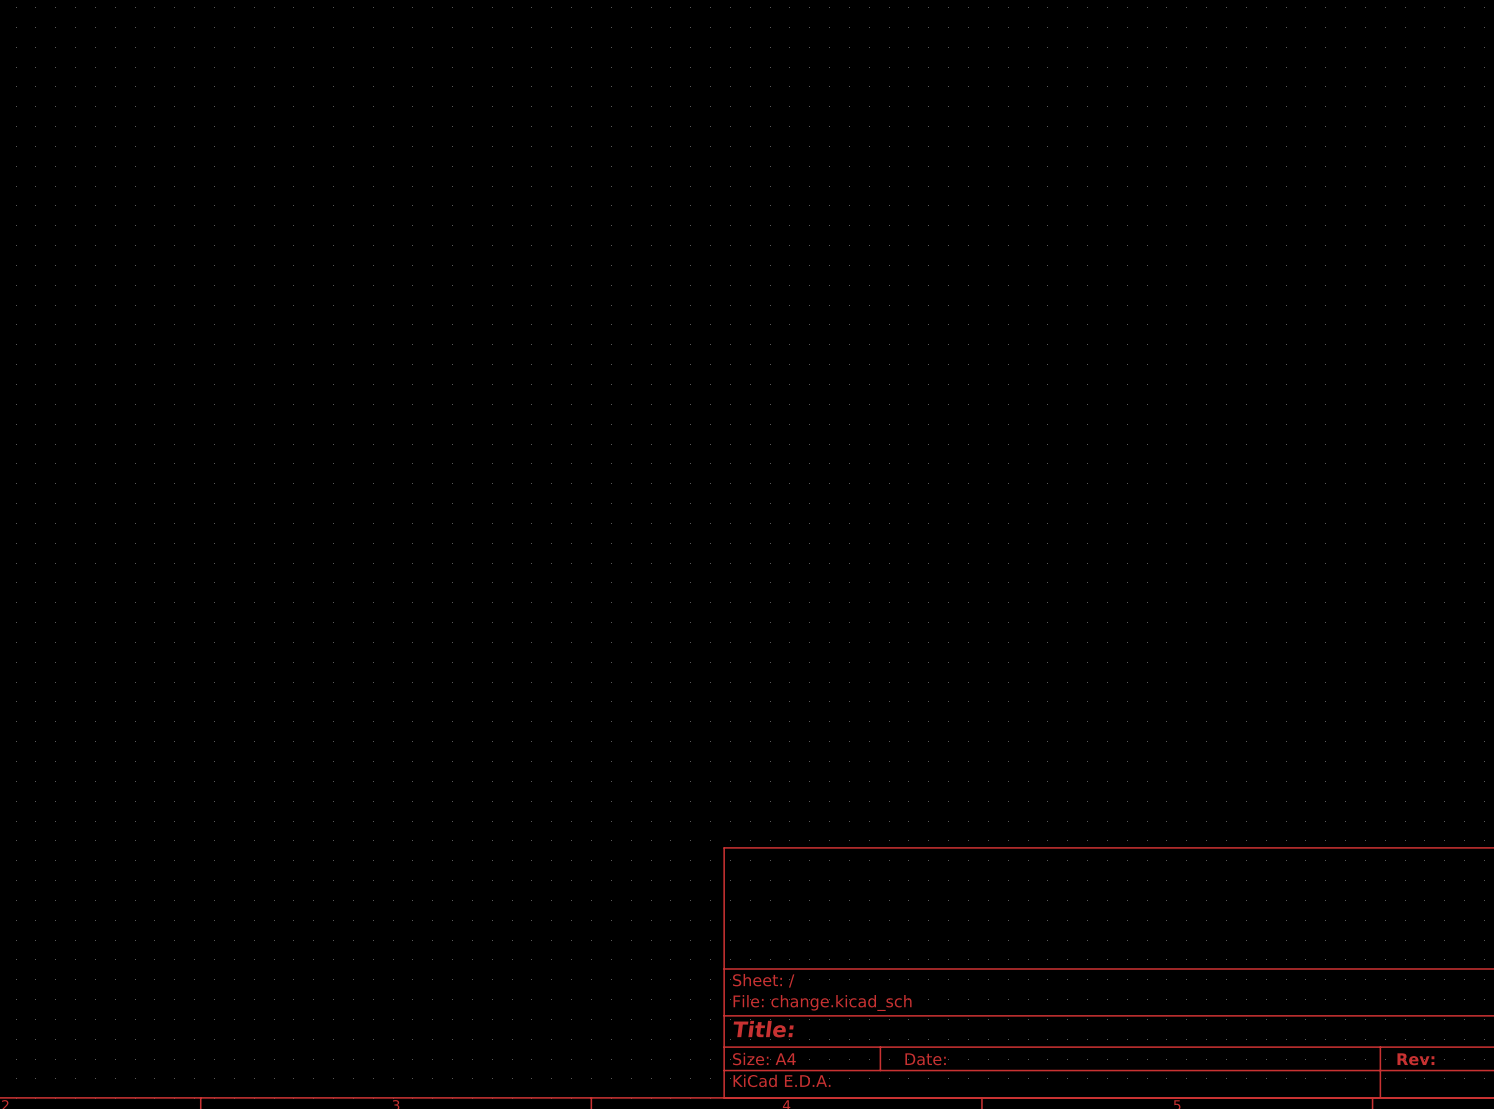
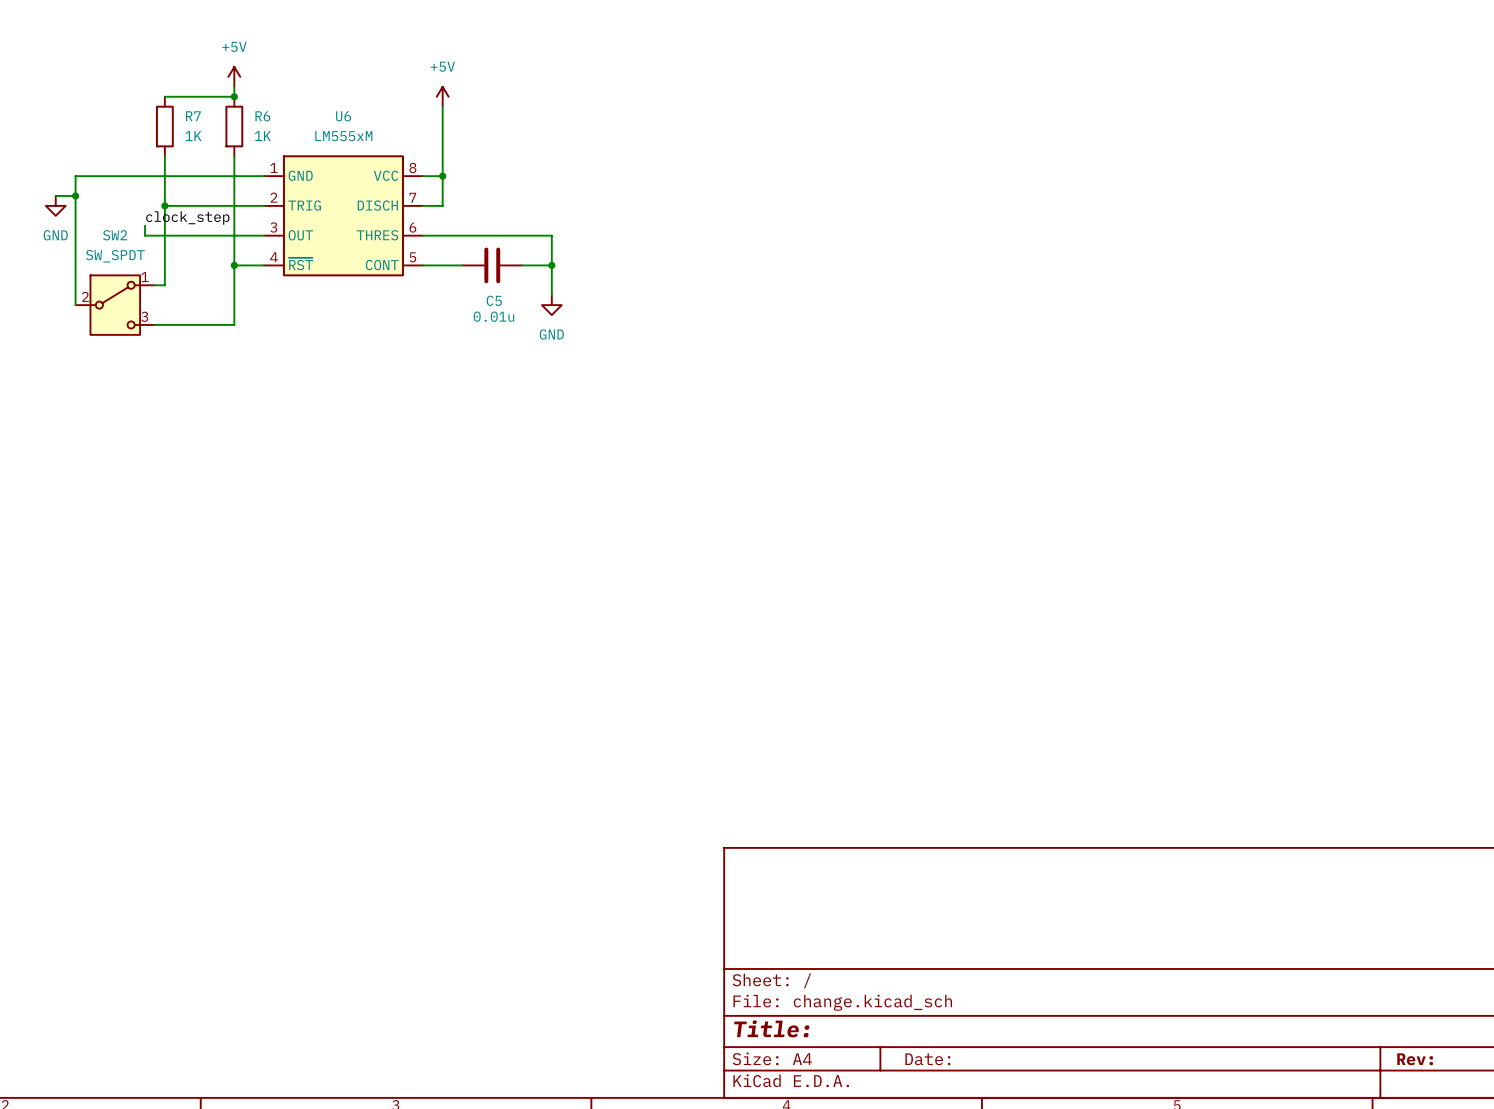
power symbol: none -> +5V (234, 76)
wire: none -> (234, 86) (234, 96) (164, 96)
junction: none -> (234, 96)
power symbol: none -> +5V (442, 96)
wire: none -> (442, 106) (442, 205) (422, 205)
R7: none -> 1K (164, 126)
R6: none -> 1K (234, 126)
wire: none -> (164, 156) (164, 285) (154, 285)
wire: none -> (234, 156) (234, 324) (154, 324)
wire: none -> (264, 176) (75, 176) (75, 305)
wire: none -> (422, 176) (442, 176)
junction: none -> (442, 176)
wire: none -> (55, 195) (75, 195)
junction: none -> (75, 195)
power symbol: none -> GND (55, 205)
wire: none -> (164, 205) (264, 205)
junction: none -> (164, 205)
U6: none -> LM555xM (343, 215)
label: none -> clock_step (187, 218)
wire: none -> (145, 225) (145, 235) (264, 235)
wire: none -> (422, 235) (551, 235) (551, 295)
wire: none -> (234, 265) (264, 265)
junction: none -> (234, 265)
wire: none -> (422, 265) (462, 265)
C5: none -> 0.01u (492, 265)
wire: none -> (522, 265) (551, 265)
junction: none -> (551, 265)
SW2: none -> SW_SPDT (115, 305)
power symbol: none -> GND (551, 305)

